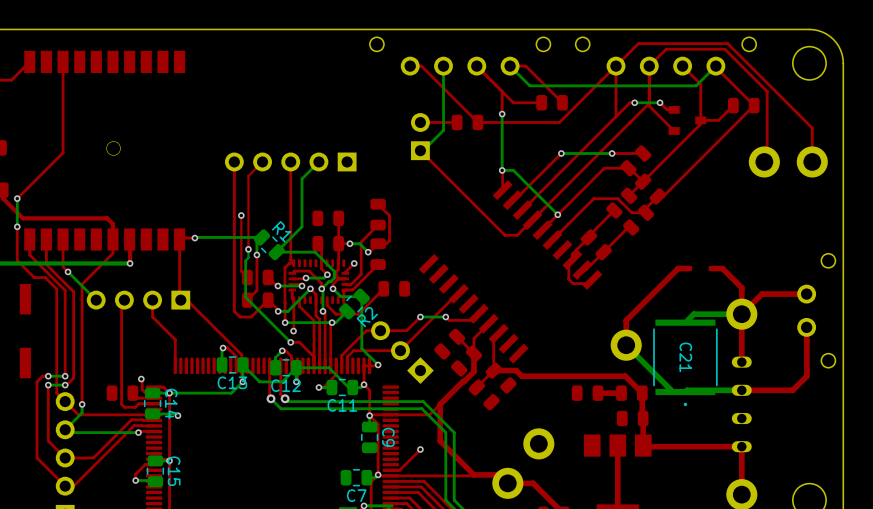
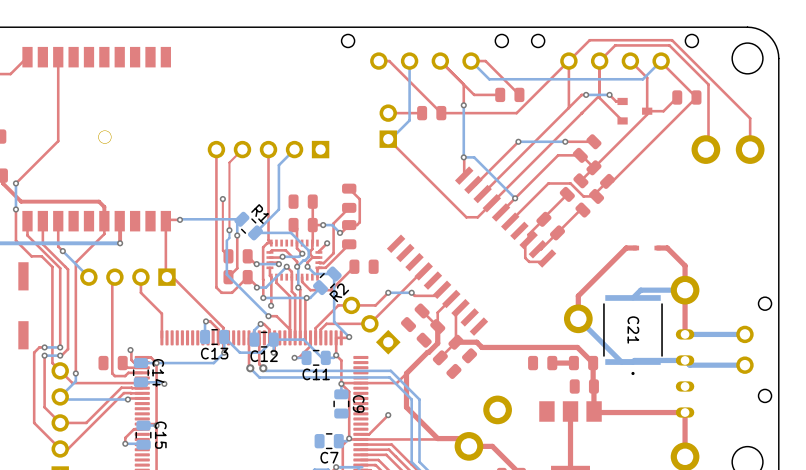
top track: (806, 294) (761, 294) (741, 314) -> none
part position: (816, 310) -> (753, 349)
top track: (806, 327) (806, 376) (792, 390) (741, 390) -> none
bottom track: none -> (744, 334) (685, 334)
bottom track: none -> (685, 360) (689, 365) (744, 365)

